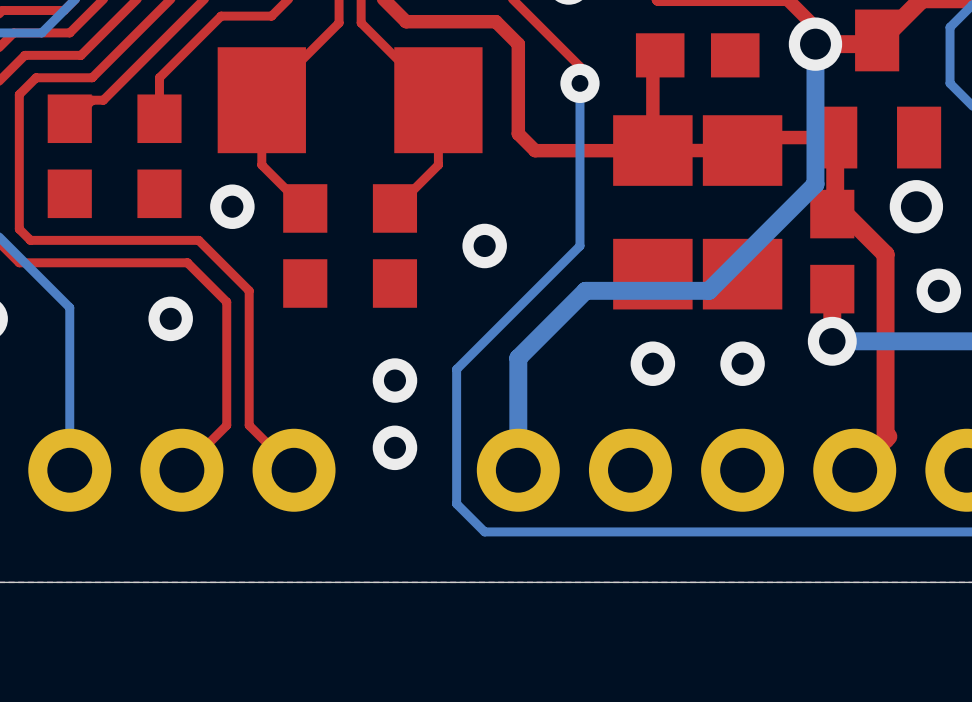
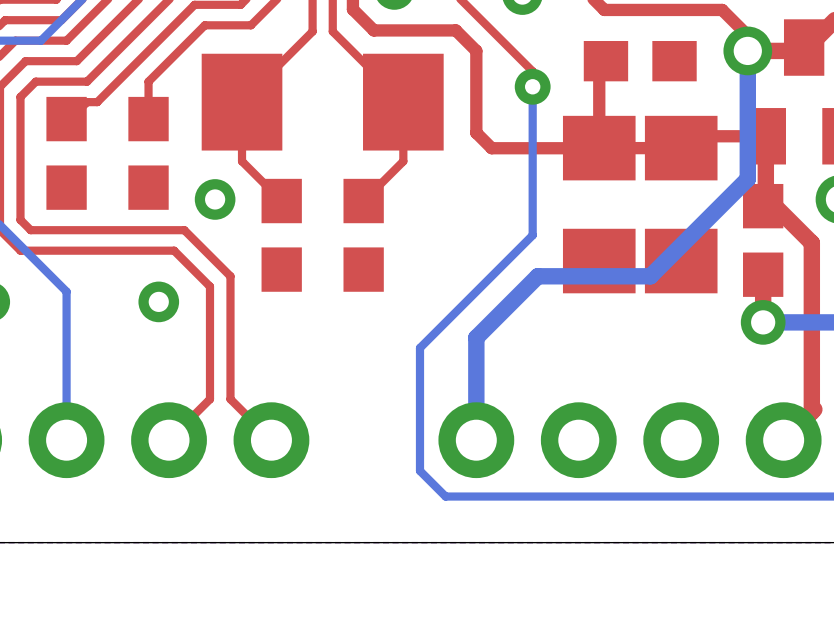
via: (484, 245) -> none
via: (652, 363) -> none
via: (742, 363) -> none
via: (394, 380) -> none
via: (394, 447) -> none

